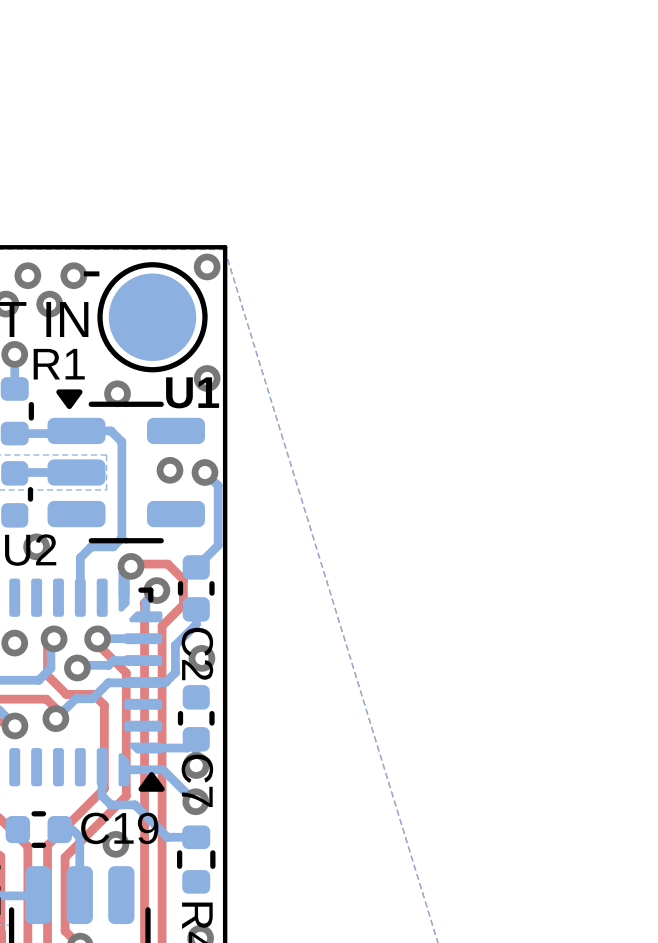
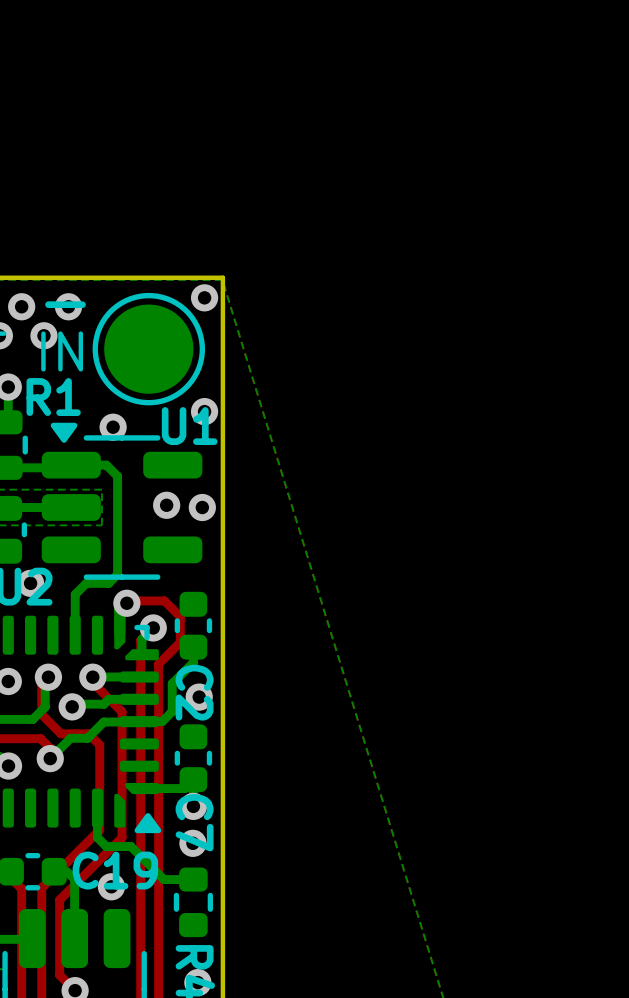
bottom track: (204, 472) (218, 485) (218, 545) (196, 567) -> none
bottom track: (124, 769) (163, 769) (194, 801) -> none

